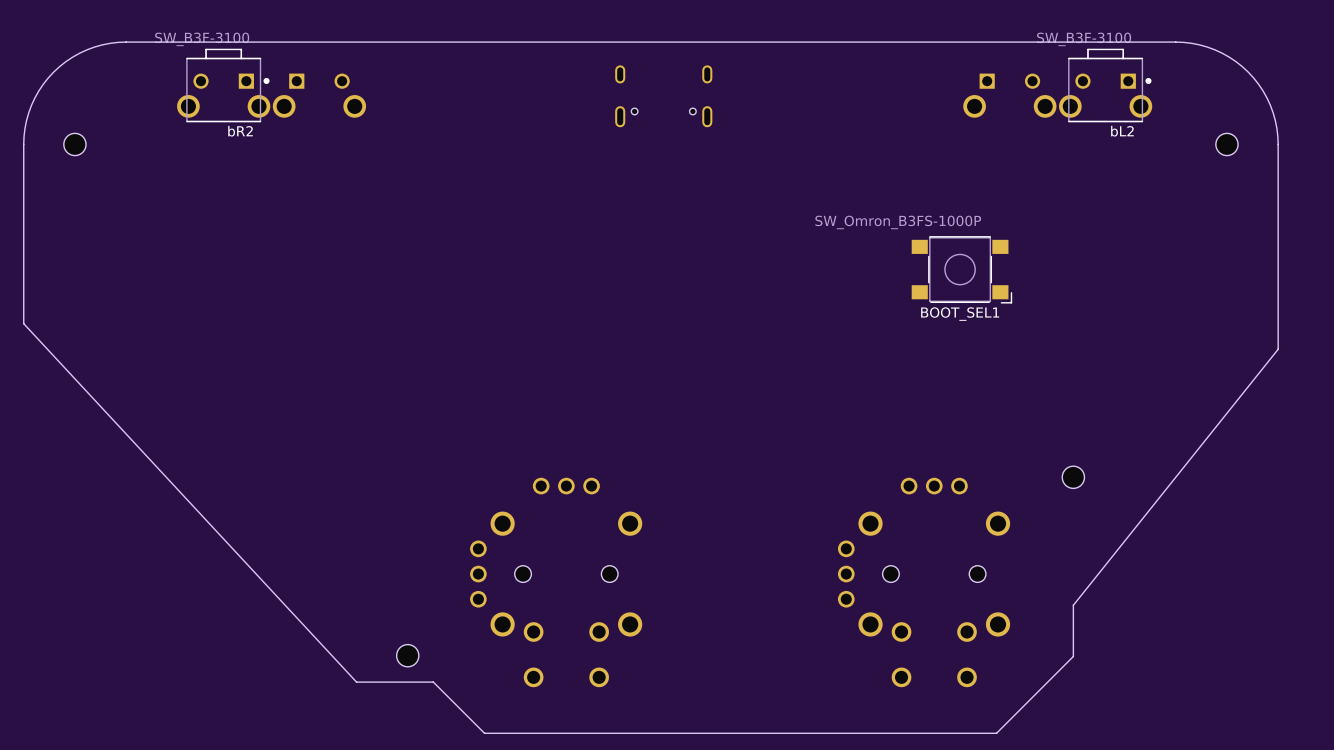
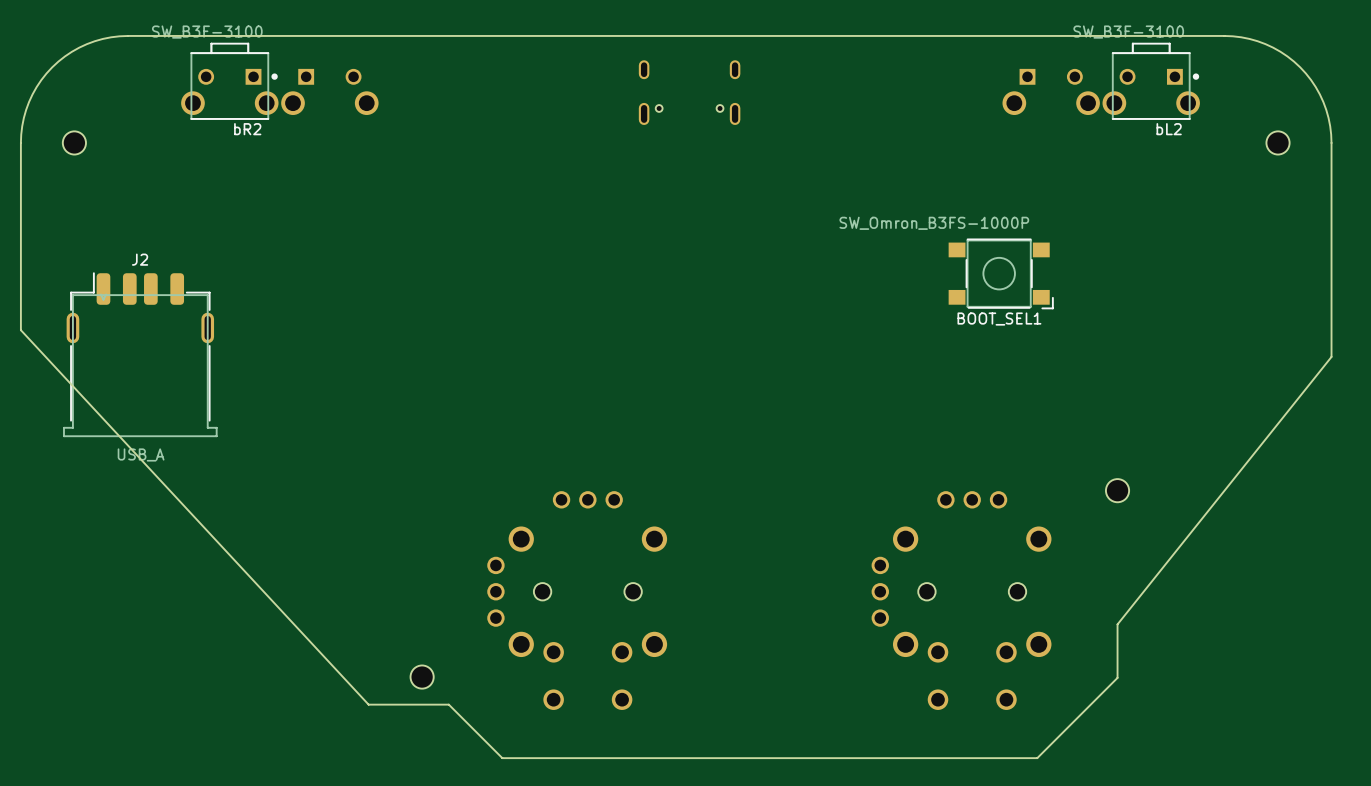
J2: none -> USB_A (140, 354)

